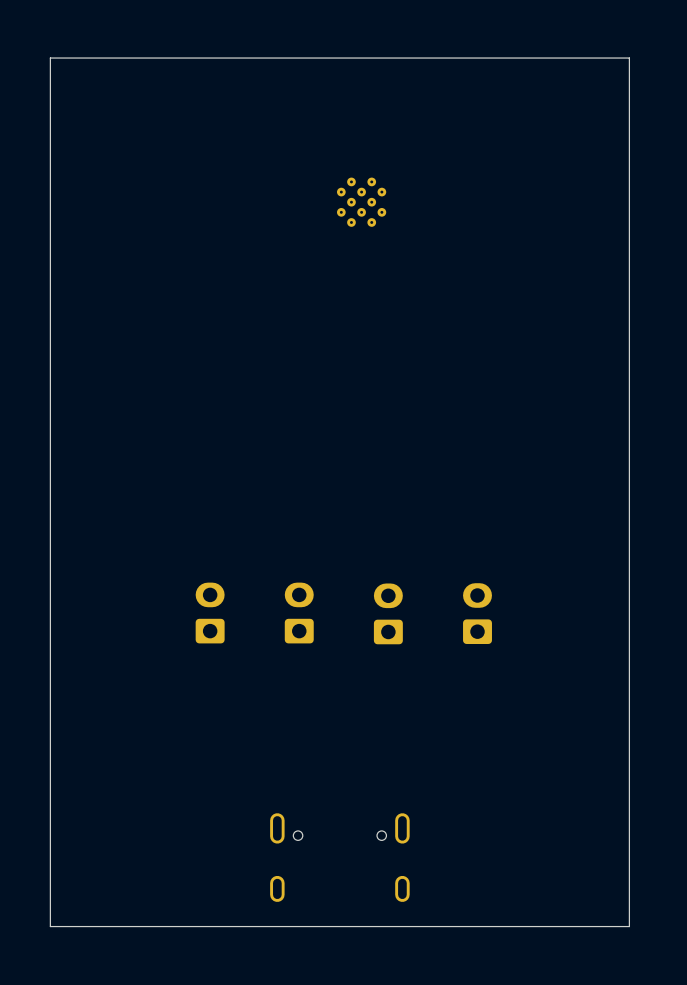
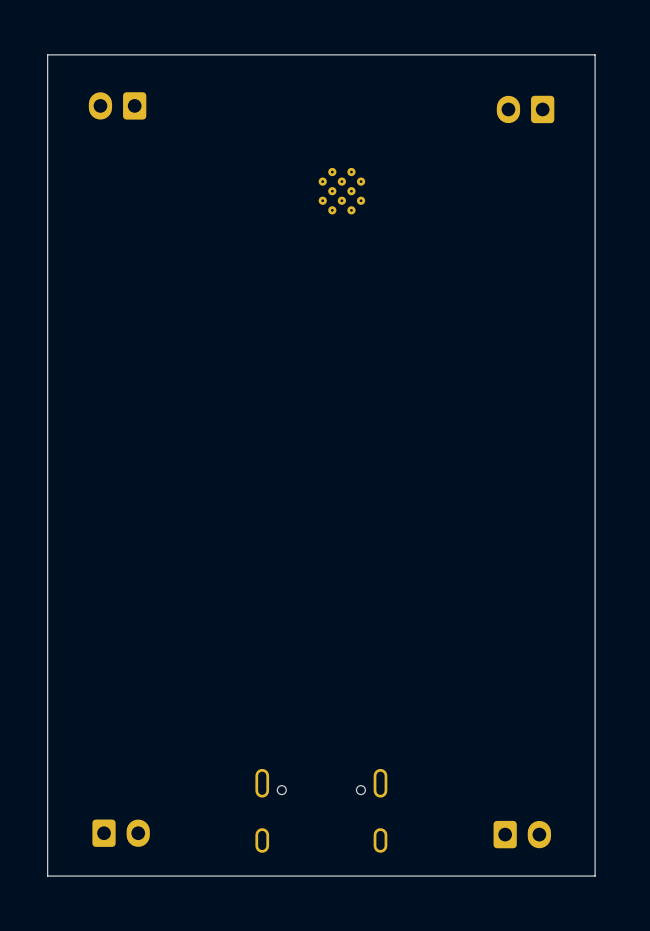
part: none -> (117, 105)
part: none -> (525, 109)
part: (210, 613) -> none
part: (299, 613) -> none
part: (388, 613) -> none
part: (477, 613) -> none
part: none -> (121, 833)
part: none -> (522, 834)

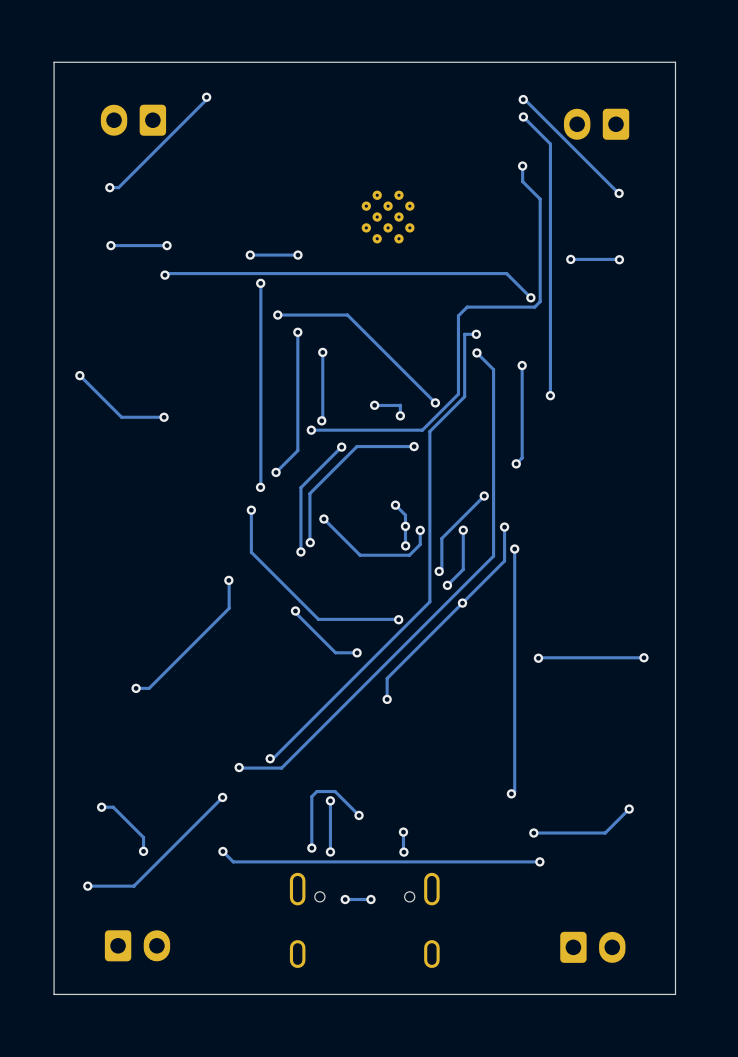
track: none -> (206, 97) (206, 99) (118, 187) (109, 187)
via: none -> (206, 97)
track: none -> (523, 99) (619, 193)
via: none -> (523, 99)
track: none -> (523, 116) (550, 143) (550, 395)
via: none -> (523, 116)
track: none -> (522, 164) (522, 181) (540, 199) (540, 301) (534, 307) (467, 307) (458, 315) (458, 394) (422, 430) (311, 430)
via: none -> (522, 166)
via: none -> (109, 187)
via: none -> (619, 193)
via: none -> (110, 245)
track: none -> (167, 245) (110, 245)
via: none -> (167, 245)
via: none -> (250, 255)
via: none -> (297, 255)
track: none -> (298, 254) (250, 255)
track: none -> (570, 259) (619, 259)
via: none -> (570, 259)
via: none -> (619, 259)
track: none -> (164, 275) (166, 273) (506, 273) (530, 297)
via: none -> (164, 275)
via: none -> (260, 283)
track: none -> (260, 284) (260, 487)
via: none -> (530, 297)
track: none -> (277, 315) (347, 315) (435, 402)
via: none -> (277, 315)
track: none -> (297, 332) (297, 450) (276, 472)
via: none -> (297, 332)
track: none -> (476, 334) (464, 334) (464, 396) (429, 431) (429, 601) (272, 758) (270, 758)
via: none -> (476, 334)
track: none -> (322, 352) (322, 419) (321, 420) (321, 418) (323, 417)
via: none -> (322, 352)
track: none -> (476, 352) (493, 369) (493, 556) (281, 768) (239, 767)
via: none -> (476, 352)
track: none -> (522, 365) (522, 457) (516, 463)
via: none -> (522, 365)
track: none -> (80, 375) (121, 417) (164, 417)
via: none -> (79, 375)
via: none -> (550, 395)
via: none -> (435, 402)
via: none -> (374, 405)
track: none -> (400, 405) (400, 415)
track: none -> (400, 405) (374, 405)
via: none -> (400, 415)
via: none -> (164, 417)
via: none -> (321, 420)
via: none -> (311, 430)
track: none -> (341, 447) (300, 487) (300, 551)
via: none -> (341, 447)
track: none -> (414, 446) (356, 446) (309, 493) (310, 542)
via: none -> (414, 446)
via: none -> (516, 463)
via: none -> (276, 472)
via: none -> (260, 487)
track: none -> (484, 496) (441, 538) (441, 568) (439, 571)
via: none -> (484, 496)
track: none -> (395, 505) (405, 515) (405, 545)
via: none -> (395, 505)
track: none -> (251, 510) (251, 552) (318, 619) (398, 619)
via: none -> (251, 510)
track: none -> (323, 518) (360, 555) (409, 555) (420, 544) (420, 530)
via: none -> (323, 519)
via: none -> (405, 526)
track: none -> (504, 527) (504, 561) (387, 678) (387, 699)
via: none -> (504, 527)
via: none -> (420, 530)
track: none -> (463, 530) (463, 569) (447, 585)
via: none -> (463, 530)
via: none -> (310, 542)
via: none -> (405, 545)
track: none -> (514, 549) (514, 791) (511, 793)
via: none -> (514, 549)
via: none -> (300, 551)
via: none -> (439, 571)
track: none -> (228, 580) (229, 608) (149, 688) (136, 688)
via: none -> (228, 580)
via: none -> (447, 585)
via: none -> (462, 603)
track: none -> (295, 611) (335, 652) (357, 652)
via: none -> (295, 611)
via: none -> (398, 619)
via: none -> (357, 652)
via: none -> (538, 658)
track: none -> (643, 657) (538, 658)
via: none -> (643, 657)
via: none -> (136, 688)
via: none -> (387, 699)
via: none -> (270, 758)
via: none -> (239, 767)
via: none -> (511, 793)
track: none -> (222, 797) (134, 885)
via: none -> (222, 797)
track: none -> (330, 800) (330, 853)
via: none -> (330, 800)
track: none -> (101, 807) (113, 807) (143, 837) (143, 851)
via: none -> (101, 807)
track: none -> (629, 809) (605, 833) (533, 833)
via: none -> (629, 809)
track: none -> (359, 815) (335, 791) (316, 791) (311, 796) (311, 848)
via: none -> (359, 815)
track: none -> (403, 832) (403, 852)
via: none -> (403, 832)
via: none -> (533, 833)
via: none -> (311, 848)
via: none -> (143, 851)
track: none -> (222, 851) (233, 861) (539, 861)
via: none -> (222, 851)
via: none -> (330, 851)
via: none -> (403, 852)
via: none -> (539, 861)
track: none -> (87, 885) (134, 886)
via: none -> (87, 886)
via: none -> (345, 899)
track: none -> (371, 899) (345, 899)
via: none -> (371, 899)

